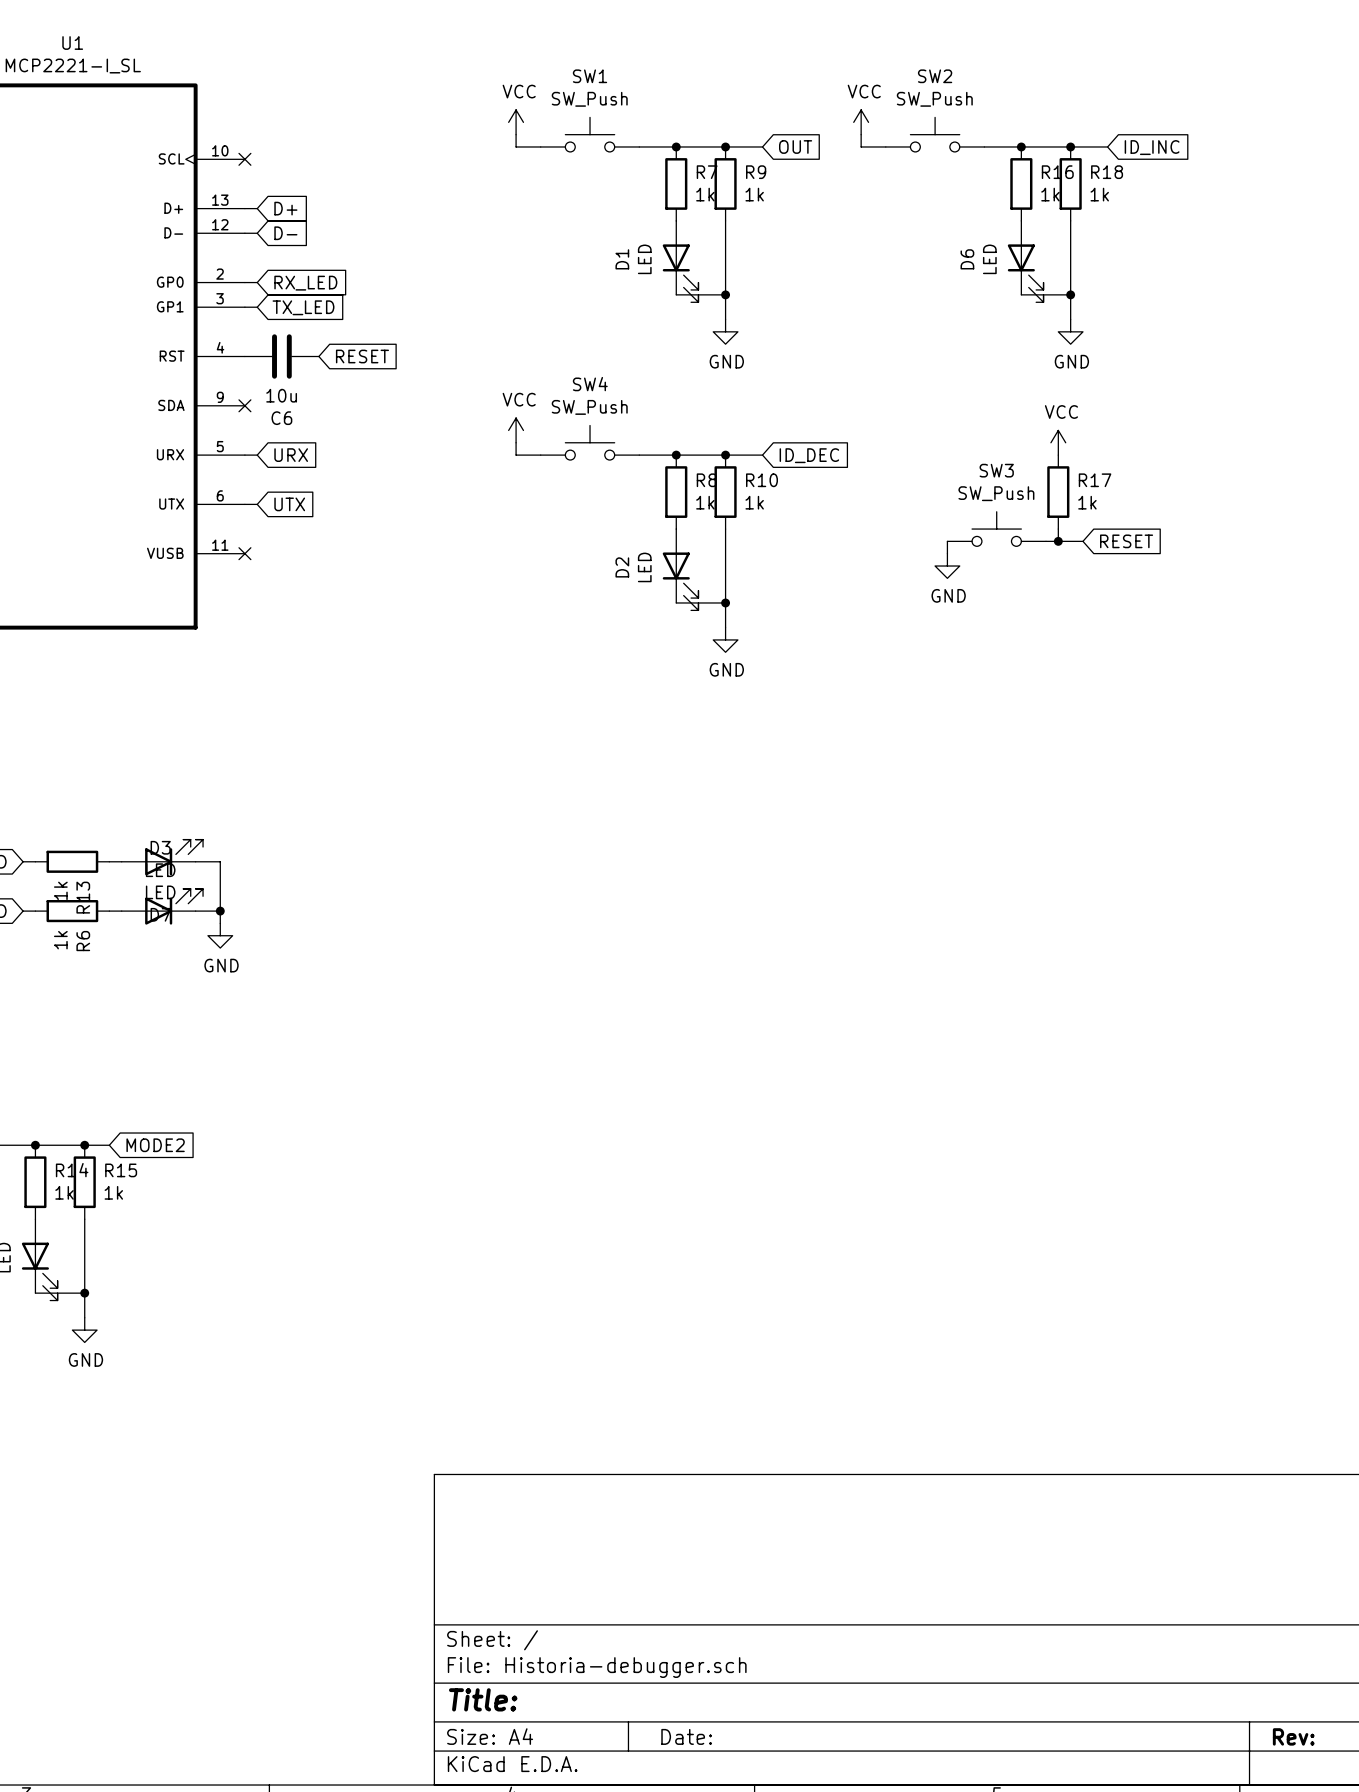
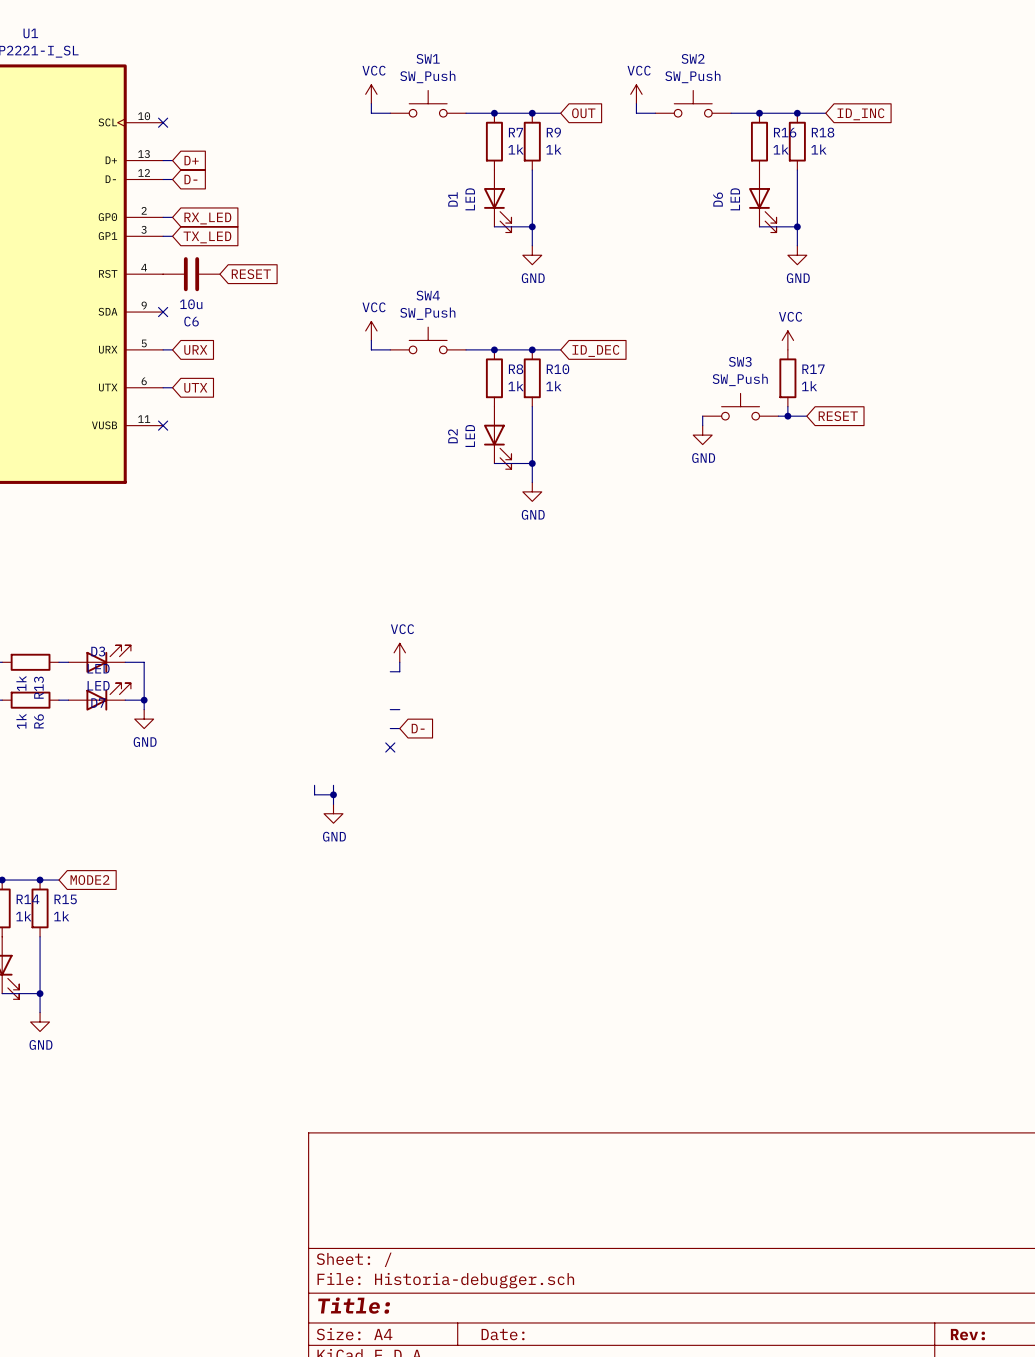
power symbol: none -> VCC (399, 652)
wire: none -> (399, 662) (399, 671) (390, 671)
wire: none -> (390, 709) (399, 709)
wire: none -> (390, 728) (399, 728)
global label: none -> D- (418, 728)
no-connect mark: none -> (390, 747)
wire: none -> (314, 785) (314, 794) (333, 794)
wire: none -> (333, 785) (333, 804)
junction: none -> (333, 794)
power symbol: none -> GND (333, 813)

